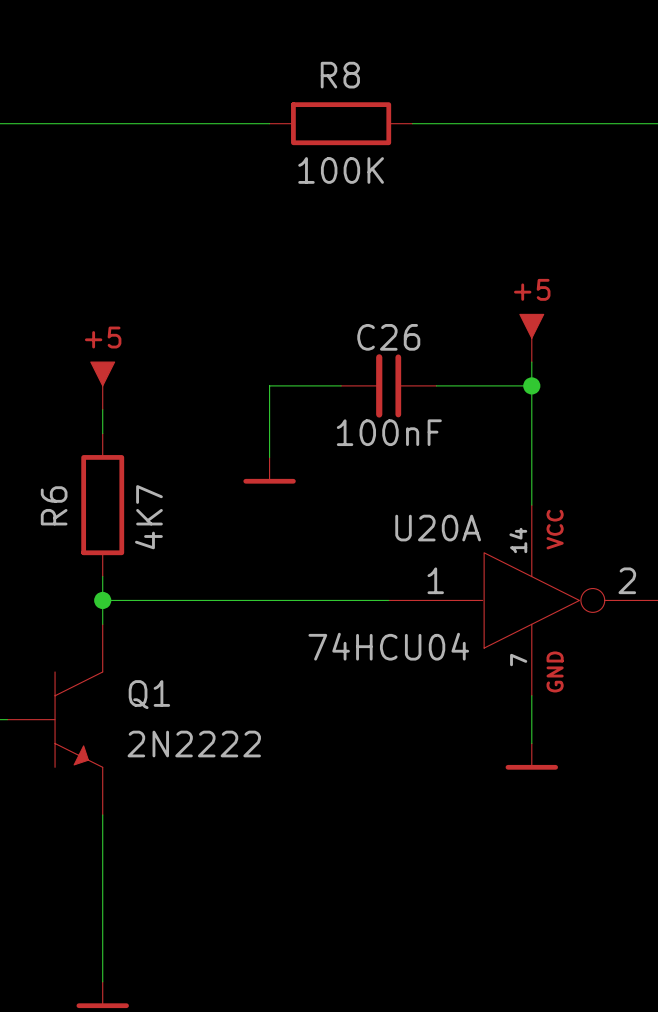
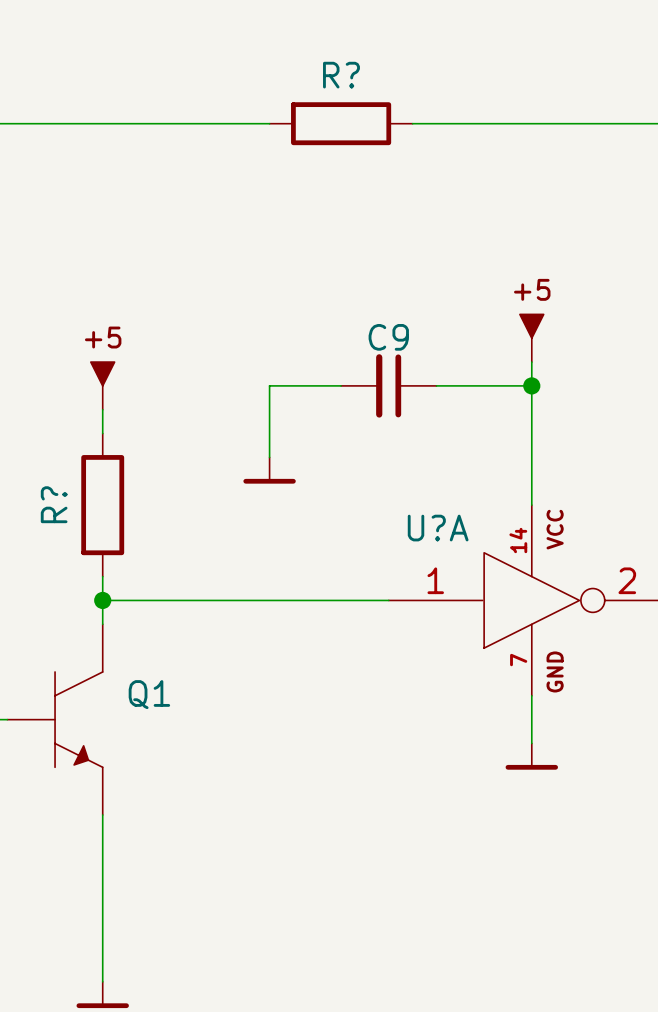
R8 name: R8 (340, 75) -> R? (341, 75)
R8 value: 100K (341, 170) -> none
C26 name: C26 (388, 337) -> C9 (388, 337)
C26 value: 100nF (389, 432) -> none
R6 name: R6 (54, 505) -> R? (54, 504)
R6 value: 4K7 (148, 517) -> none
U20A name: U20A (438, 528) -> U?A (438, 528)
U20A value: 74HCU04 (388, 646) -> none
Q1 value: 2N2222 (194, 744) -> none

